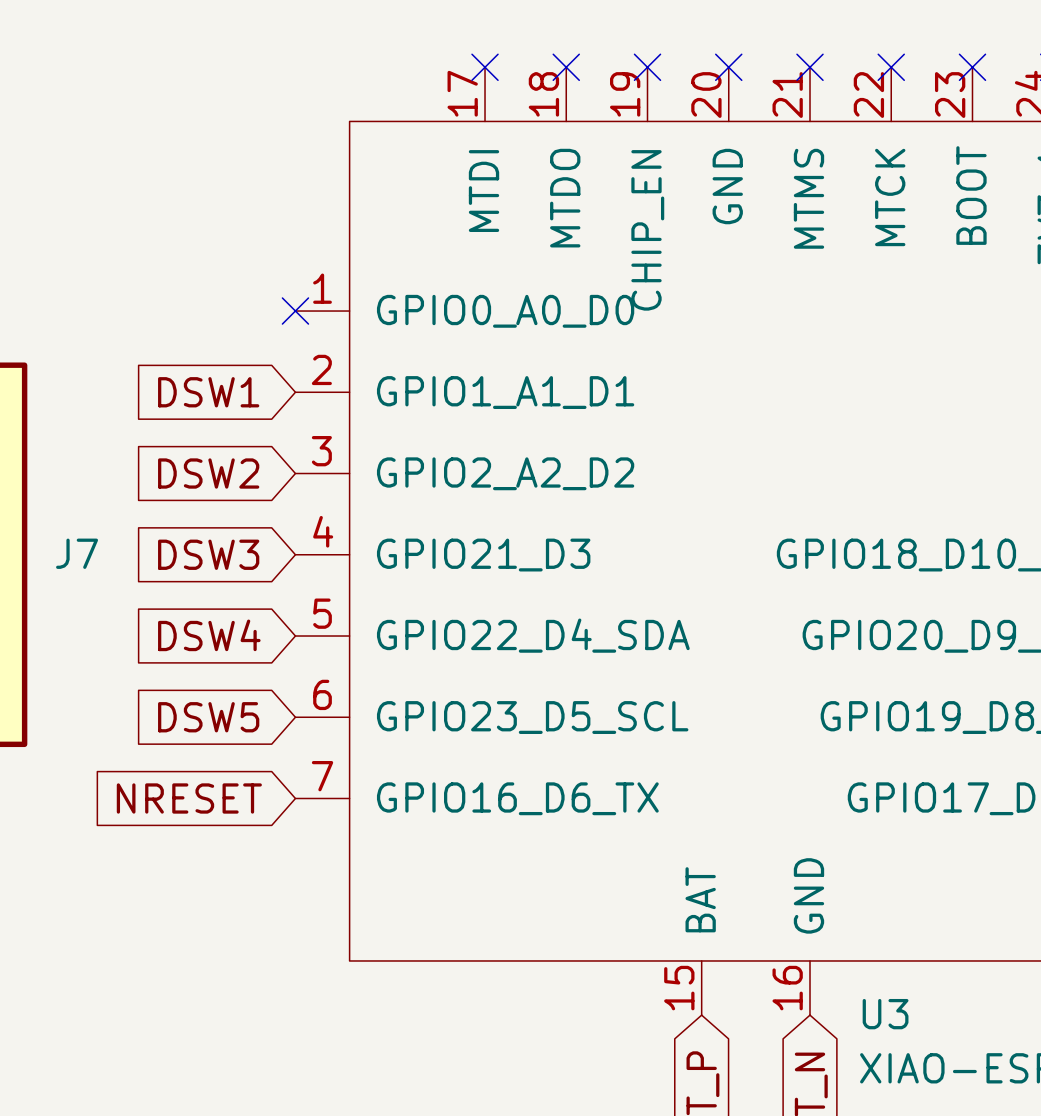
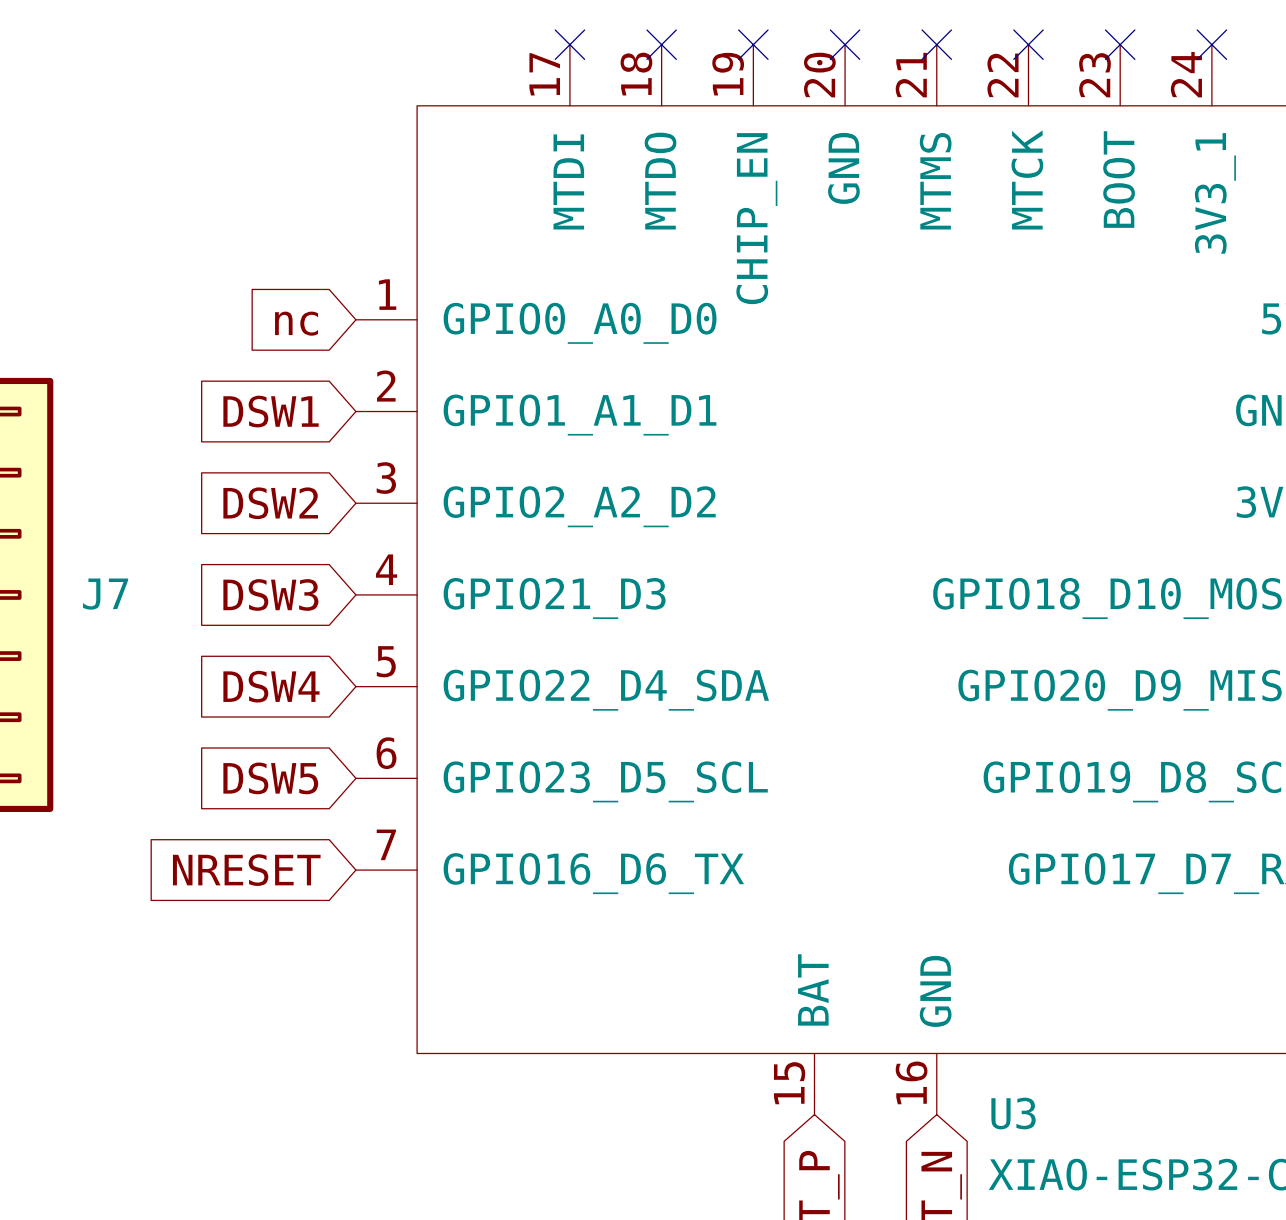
no-connect mark: (295, 311) -> none
global label: none -> nc (296, 323)

